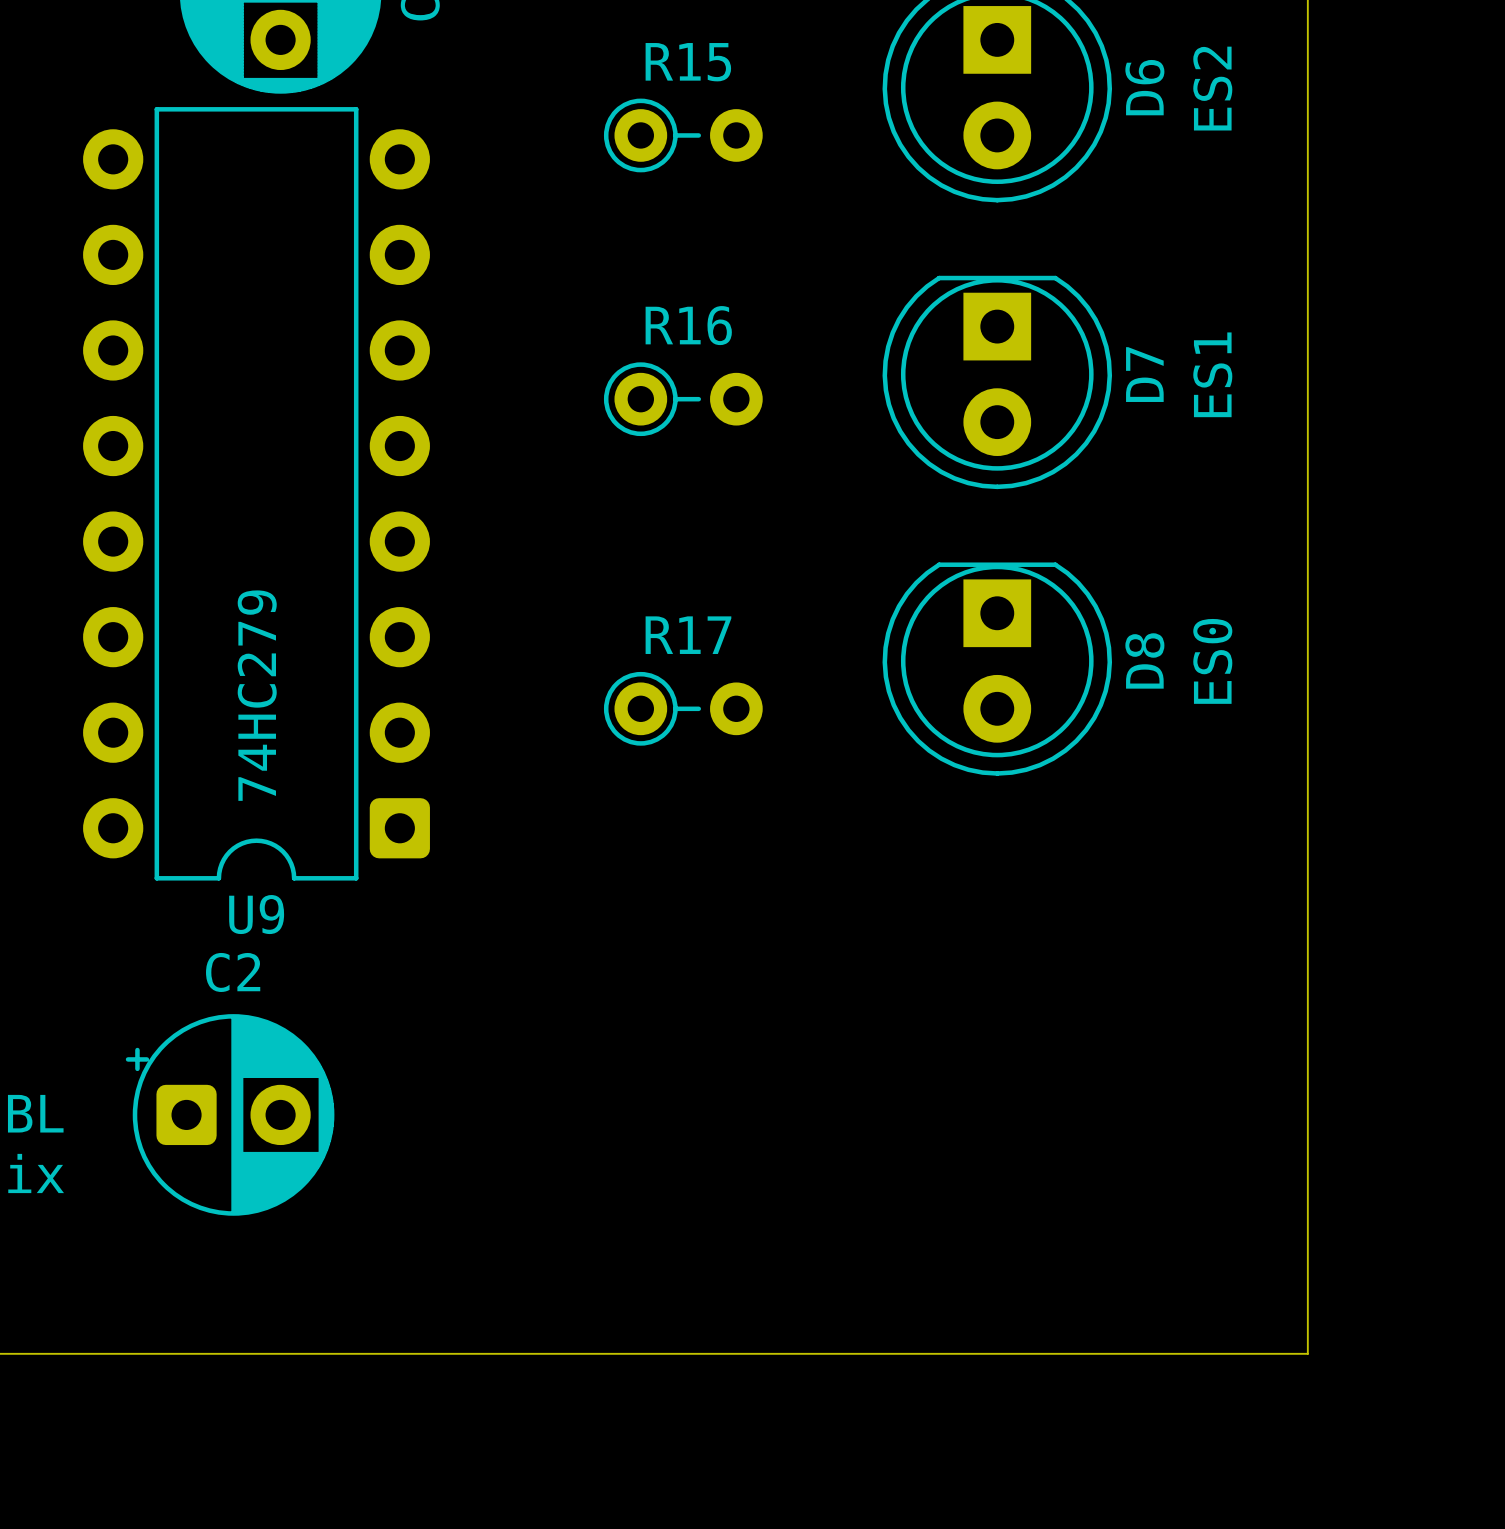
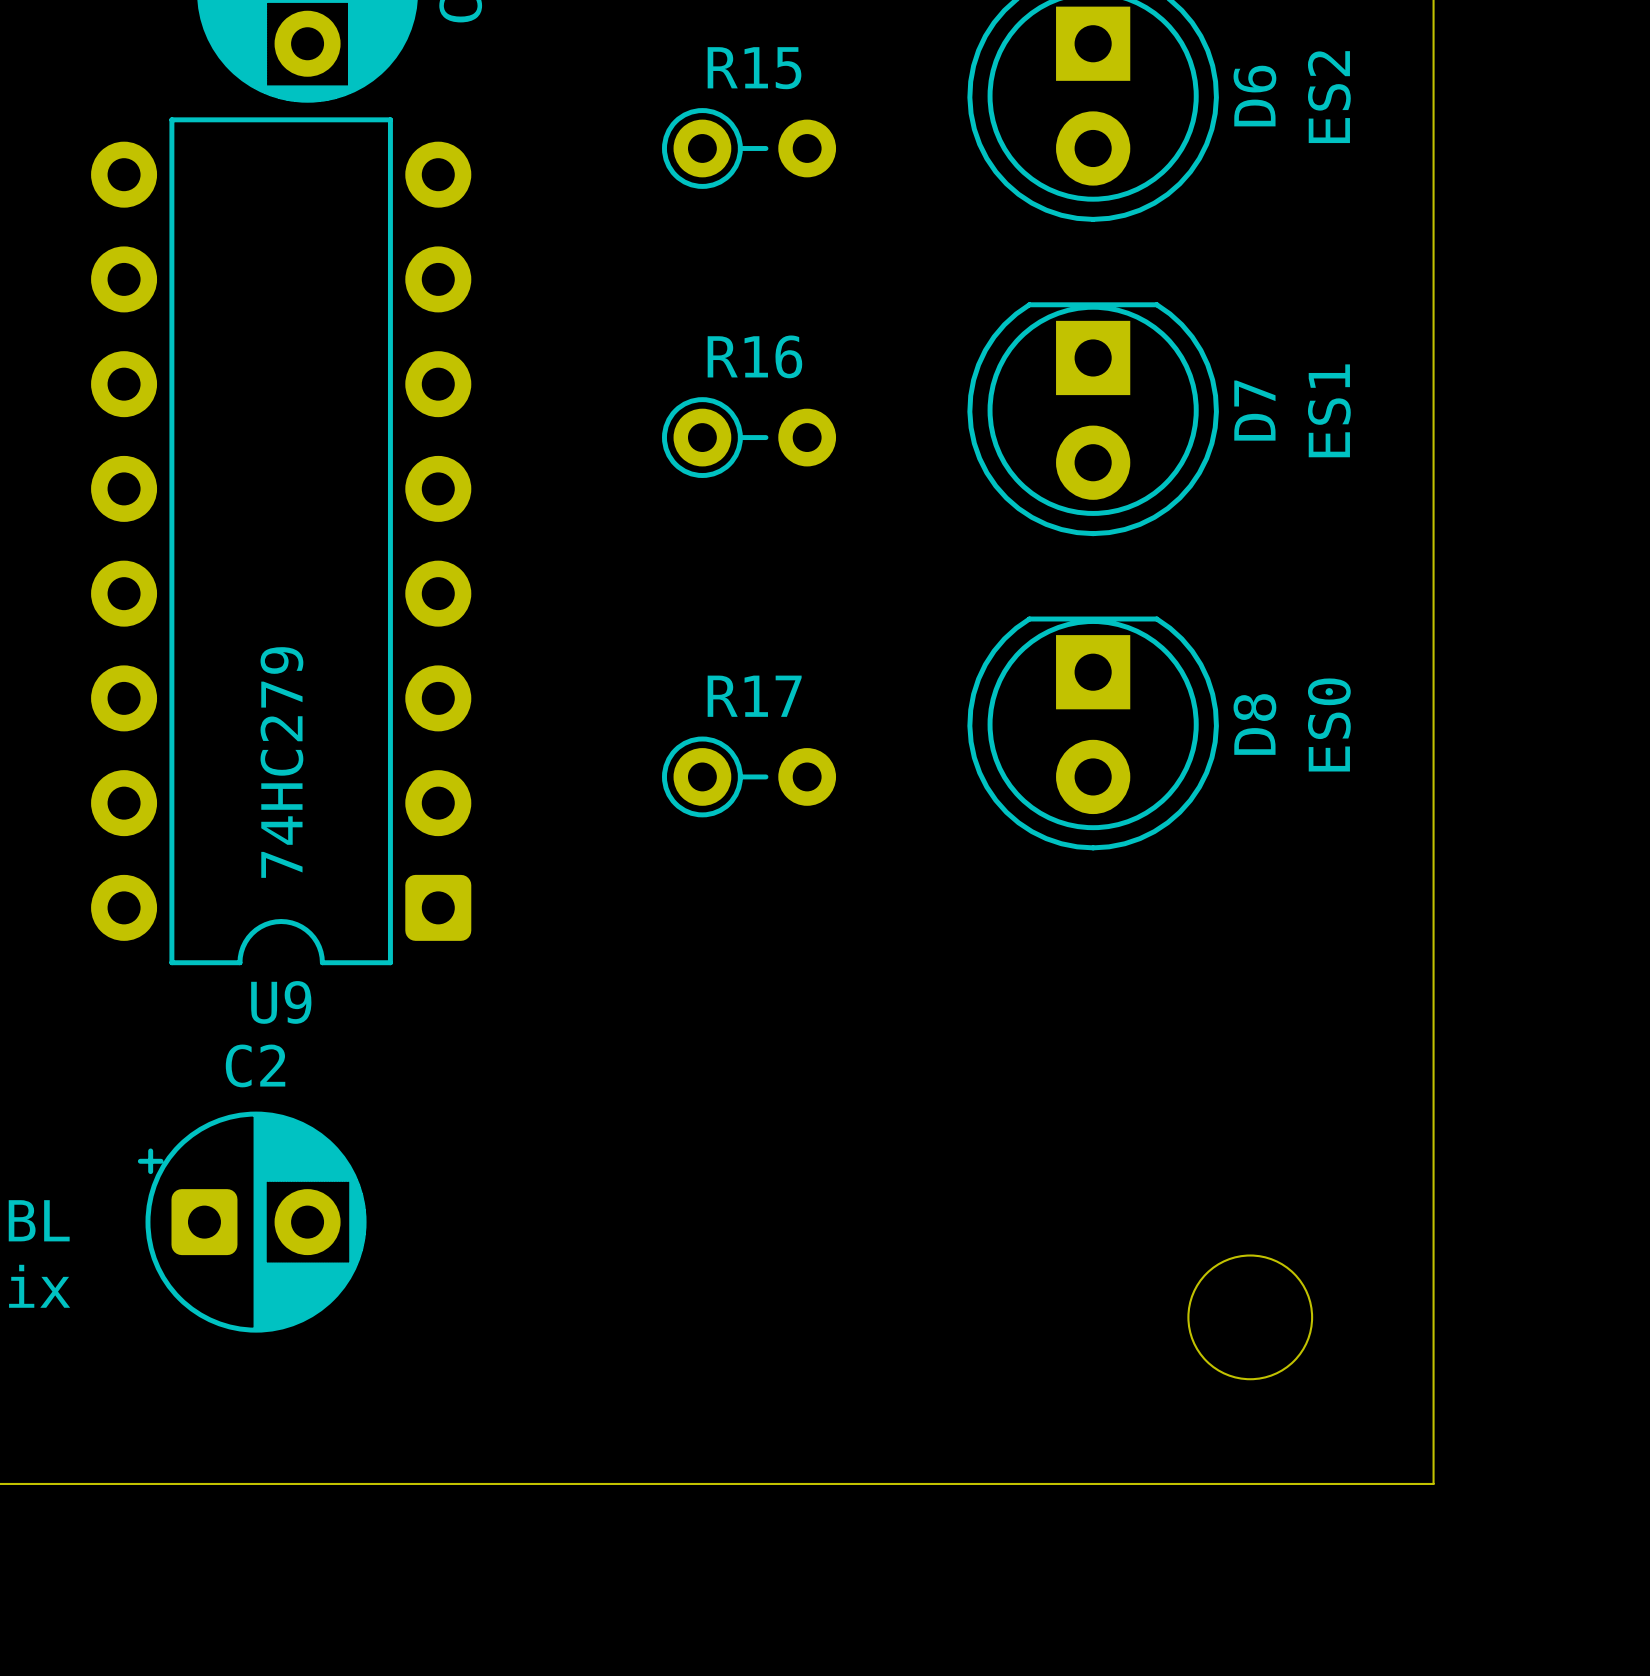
round board edge: none -> [1187, 1254, 1314, 1381]

